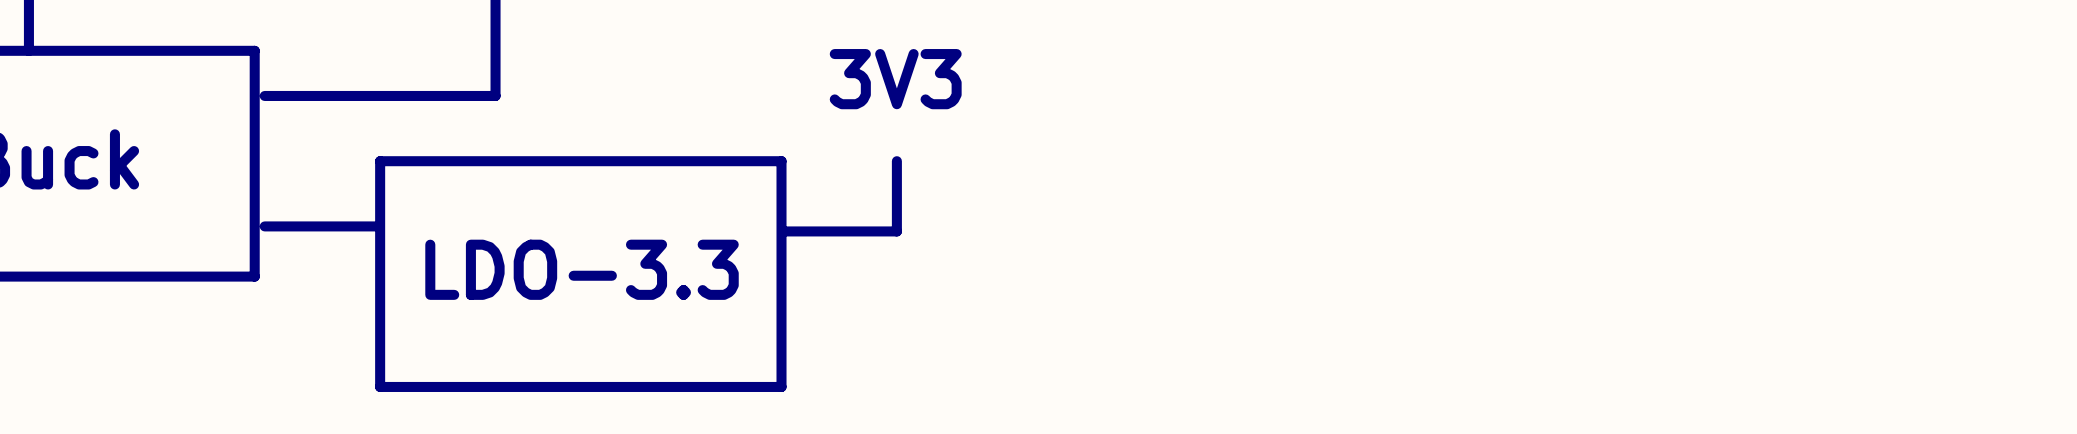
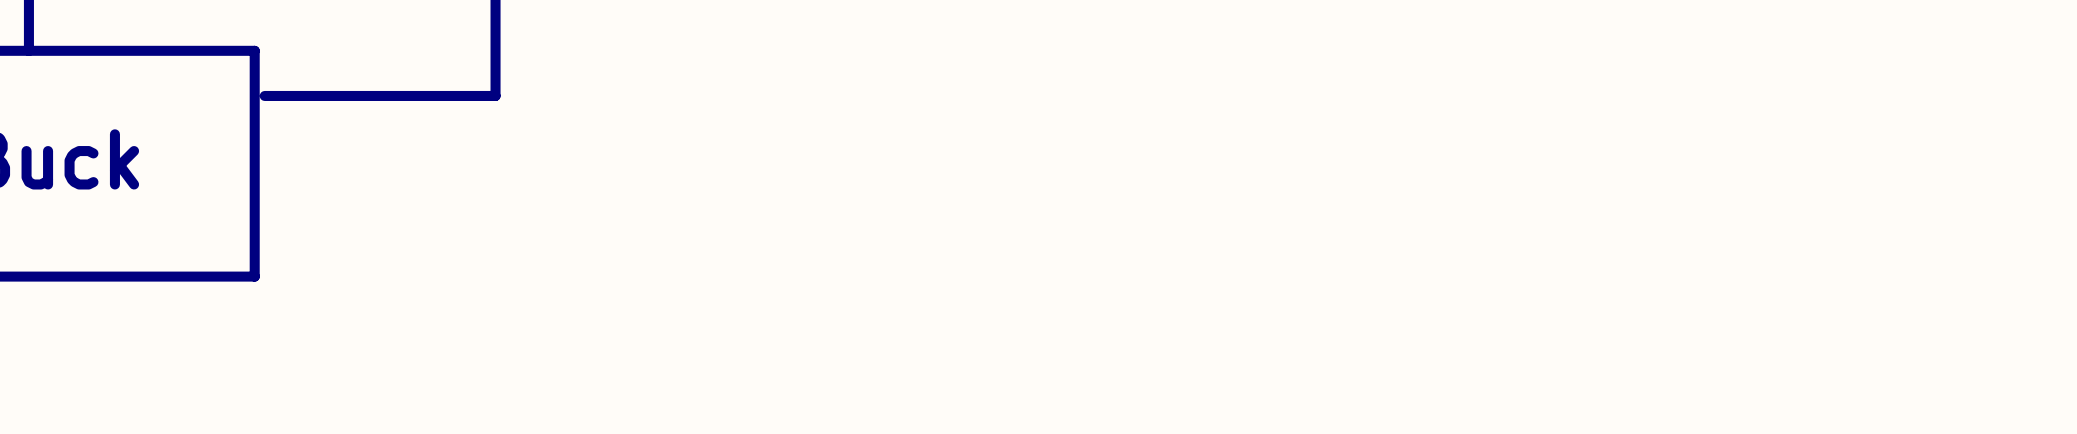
text: 3V3 (895, 79) -> none
line: (380, 161) (781, 161) (781, 386) (380, 386) (380, 161) -> none
line: (896, 161) (896, 231) (786, 231) -> none
line: (264, 226) (375, 226) -> none
text: LDO-3.3 (582, 269) -> none

